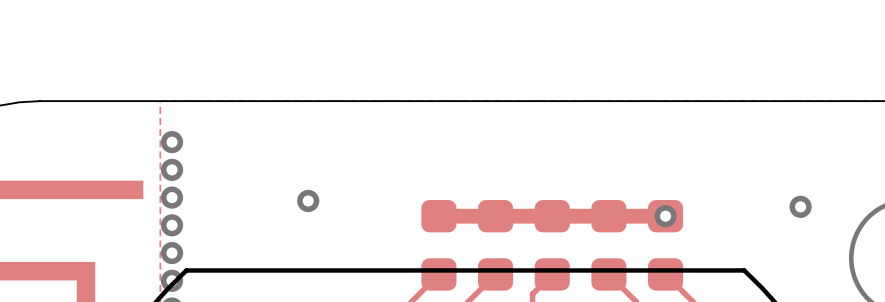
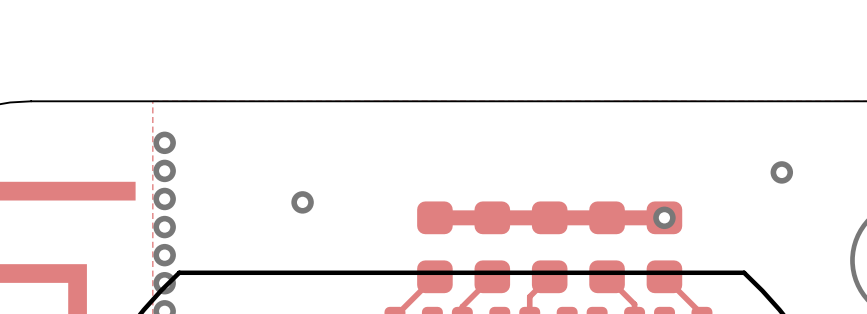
via position: (800, 206) -> (781, 172)

